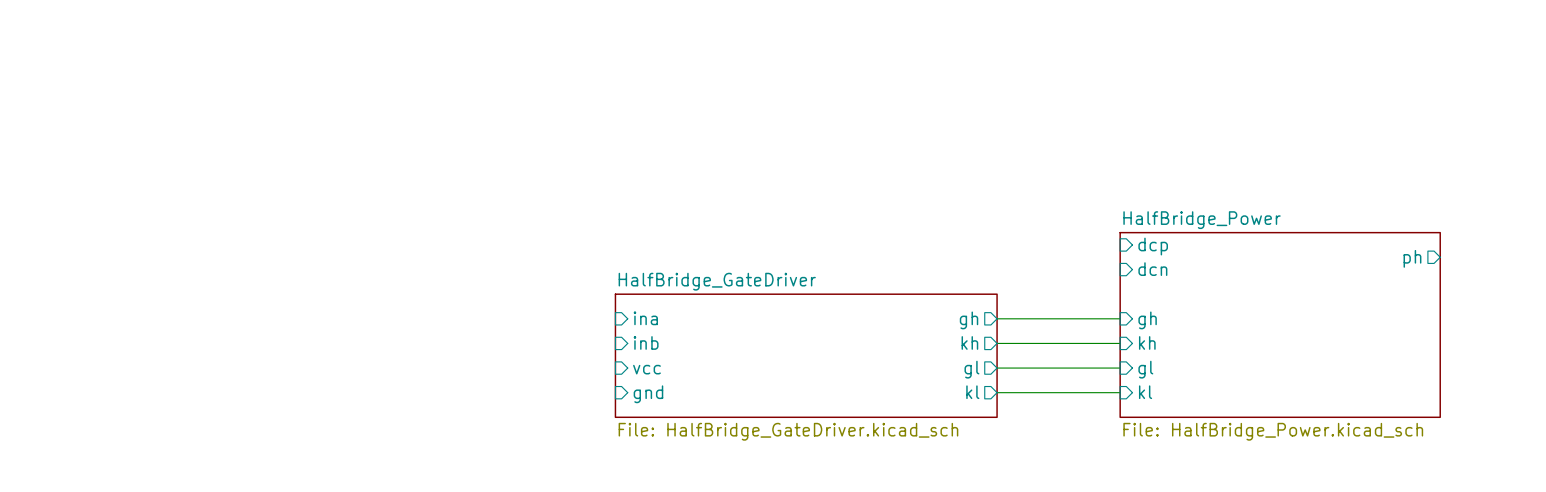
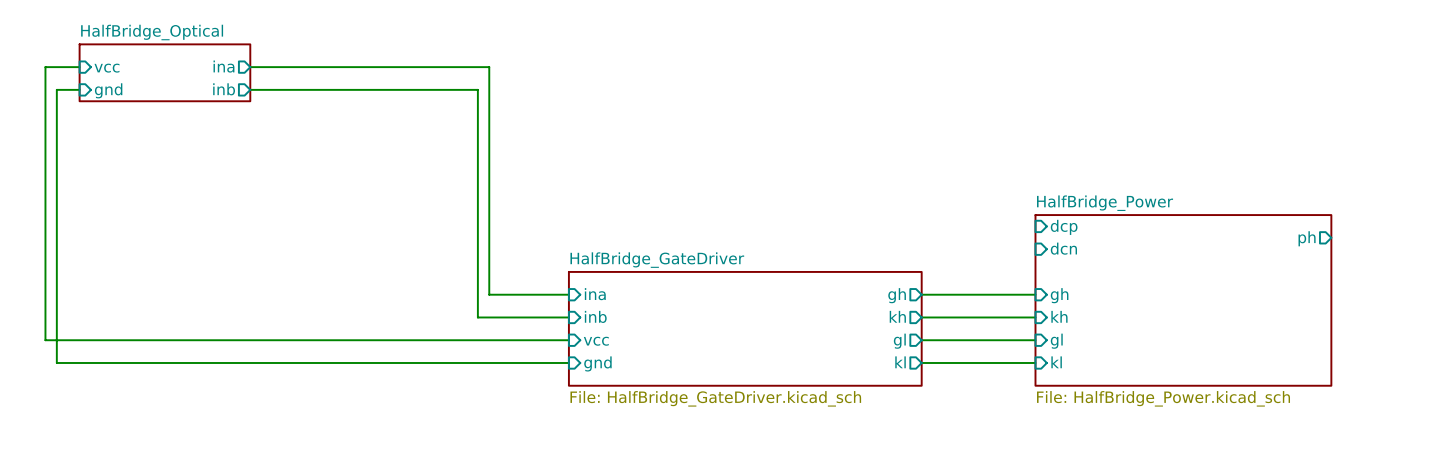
wire: none -> (79, 67) (45, 67) (45, 340) (568, 340)
sheet pin: none -> ina (223, 66)
wire: none -> (250, 67) (489, 67) (489, 294) (568, 294)
sheet pin: none -> vcc (107, 68)
sheet HalfBridge_Optical: none -> (164, 72)
sheet pin: none -> inb (224, 89)
wire: none -> (79, 89) (56, 89) (56, 362) (568, 362)
wire: none -> (250, 89) (477, 89) (477, 317) (568, 317)
sheet pin: none -> gnd (108, 90)

